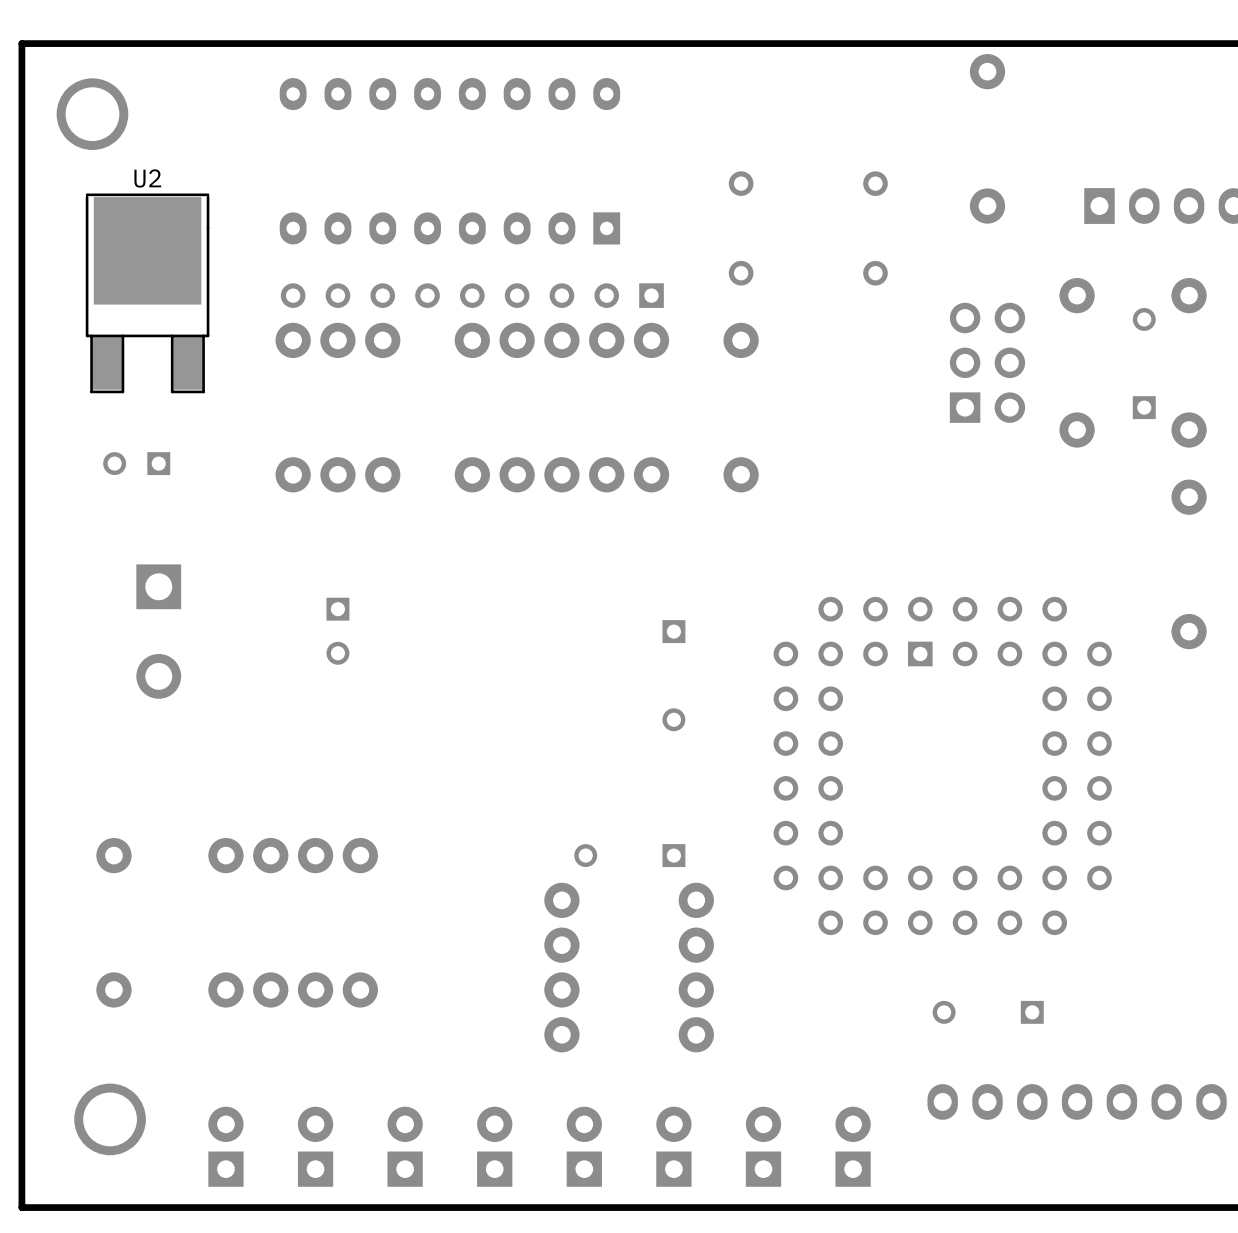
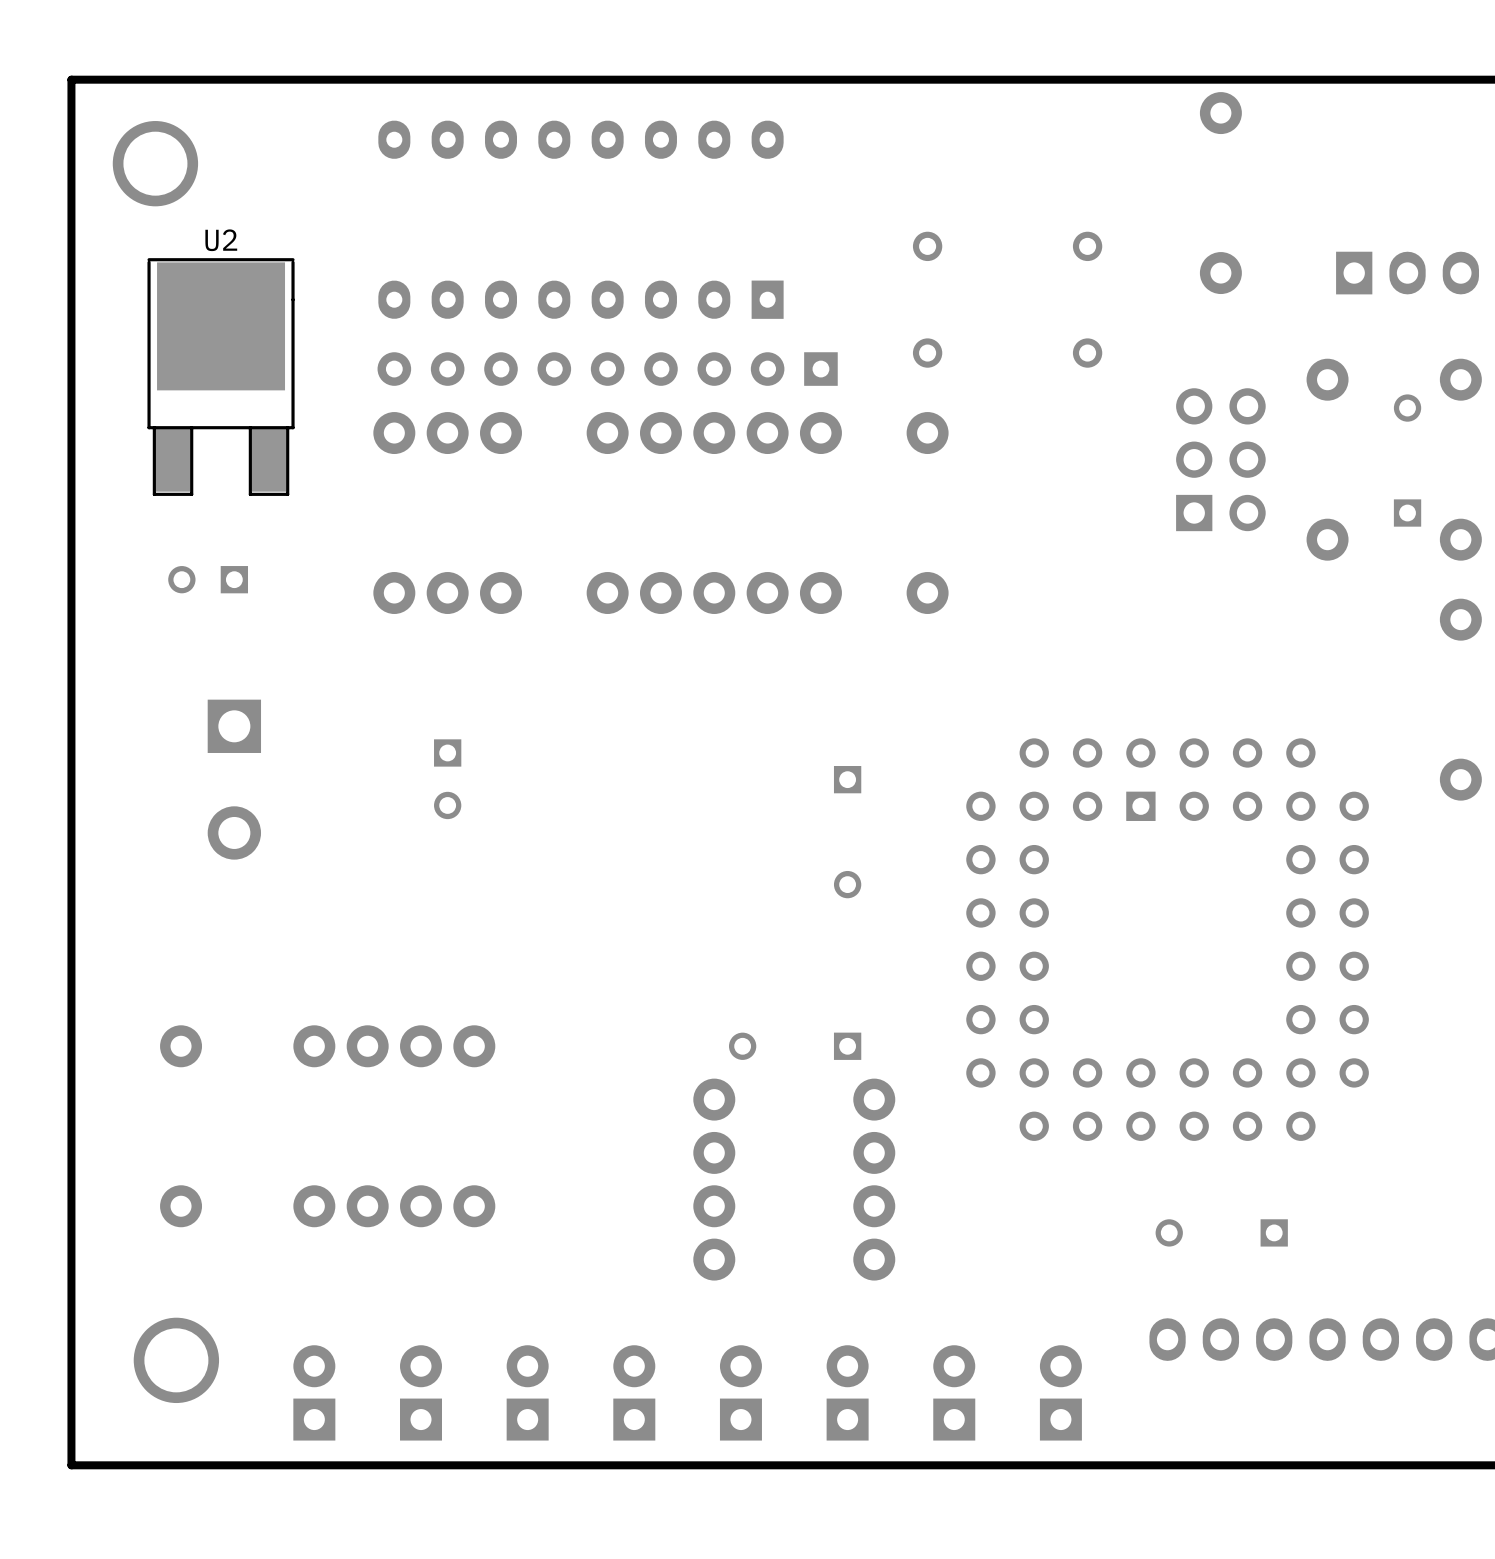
part footprint: [280, 283, 664, 308] -> [377, 352, 838, 386]

